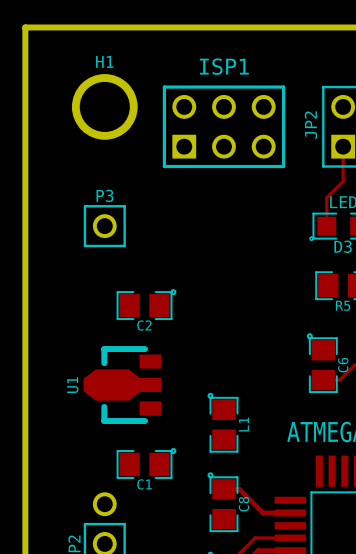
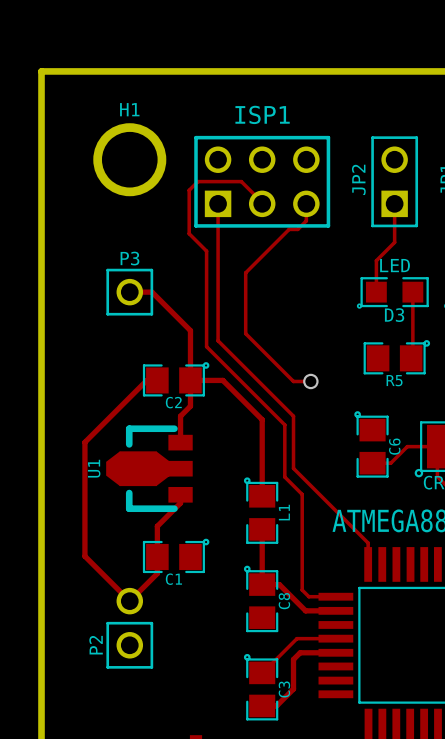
track: none -> (218, 203) (218, 340) (293, 416) (293, 468) (368, 543) (368, 564)
track: none -> (262, 203) (241, 181) (197, 181) (189, 190) (189, 233) (206, 251) (206, 346) (284, 424) (284, 477) (302, 494) (302, 590) (308, 596) (335, 596)
track: none -> (306, 203) (306, 220) (297, 229) (289, 229) (245, 272) (245, 333) (293, 381) (310, 381)
track: none -> (129, 292) (151, 292) (190, 330) (190, 406) (180, 416) (180, 442)
track: none -> (157, 380) (146, 380) (84, 442) (84, 556) (129, 601) (157, 573) (157, 526) (180, 503) (180, 494)
track: none -> (190, 380) (222, 380) (262, 419) (262, 496)
via: none -> (310, 381)
track: none -> (262, 529) (262, 584)

